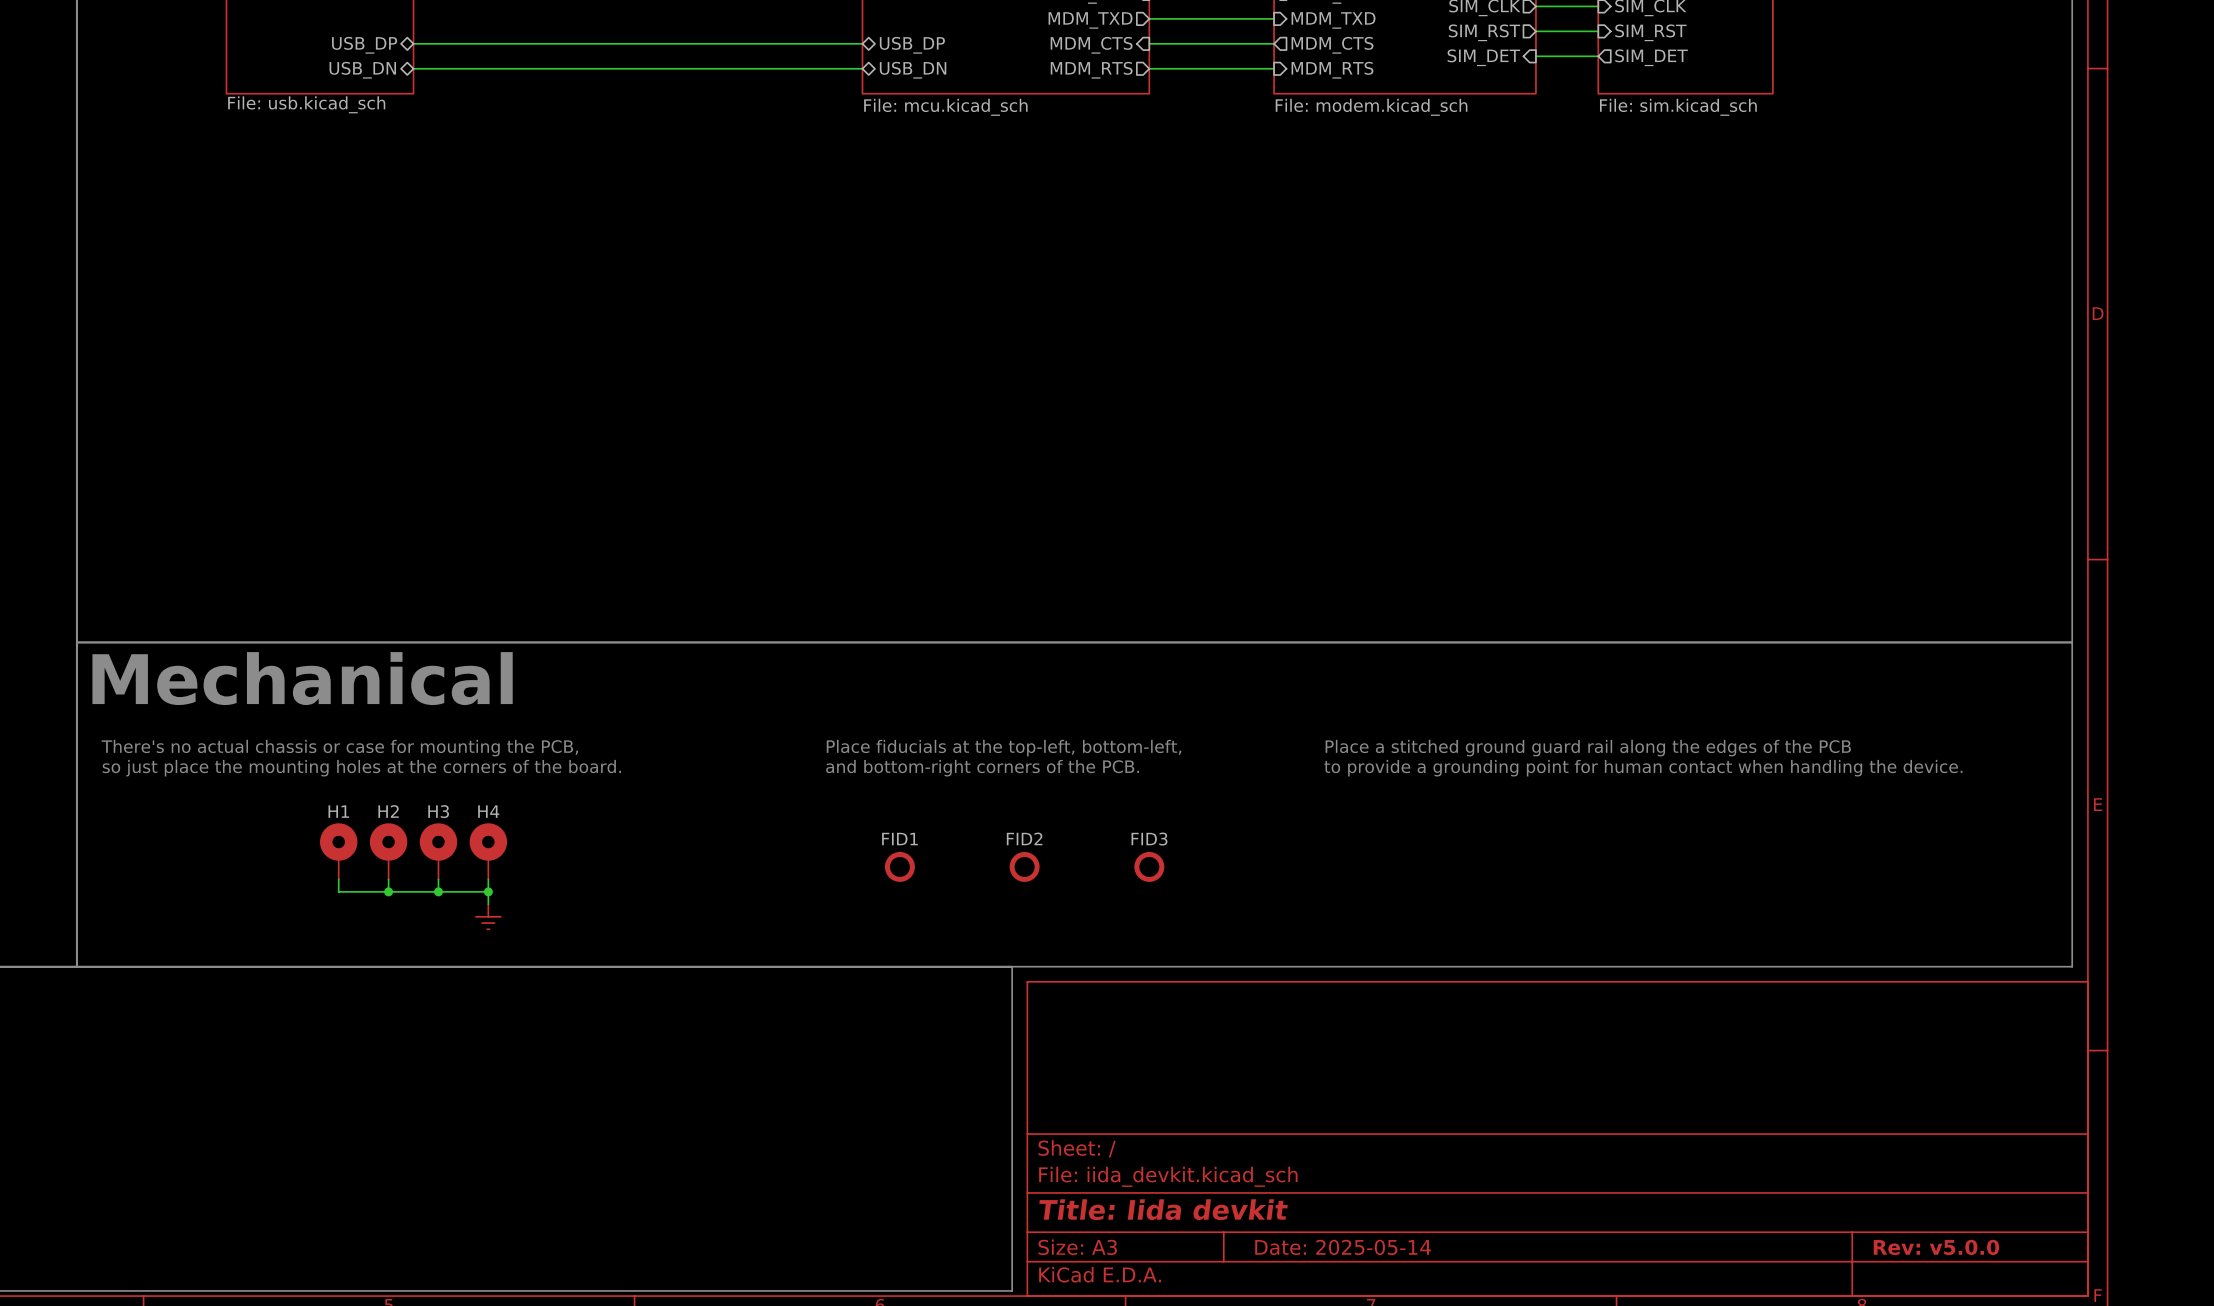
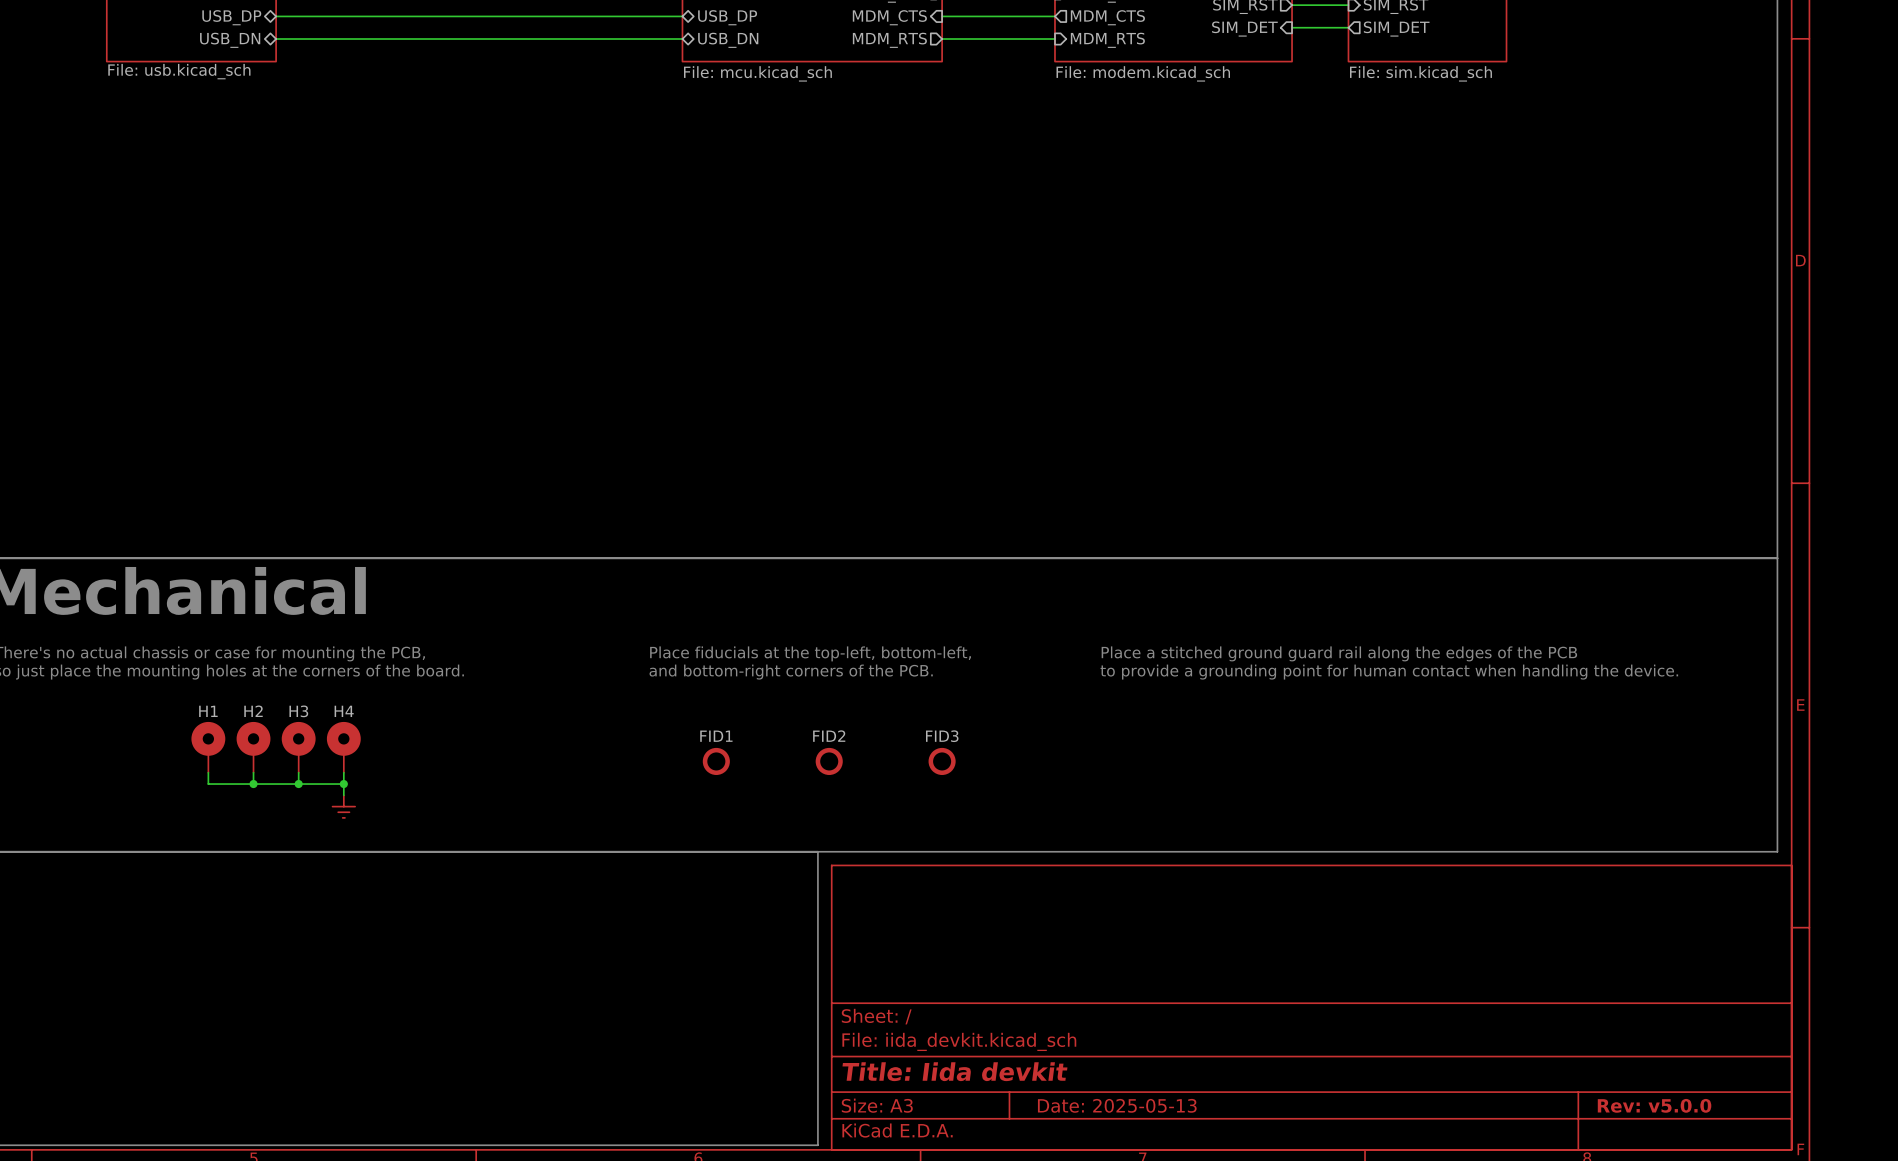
title block: Date: 2025-05-14 (1343, 1247) -> Date: 2025-05-13 (1117, 1105)

